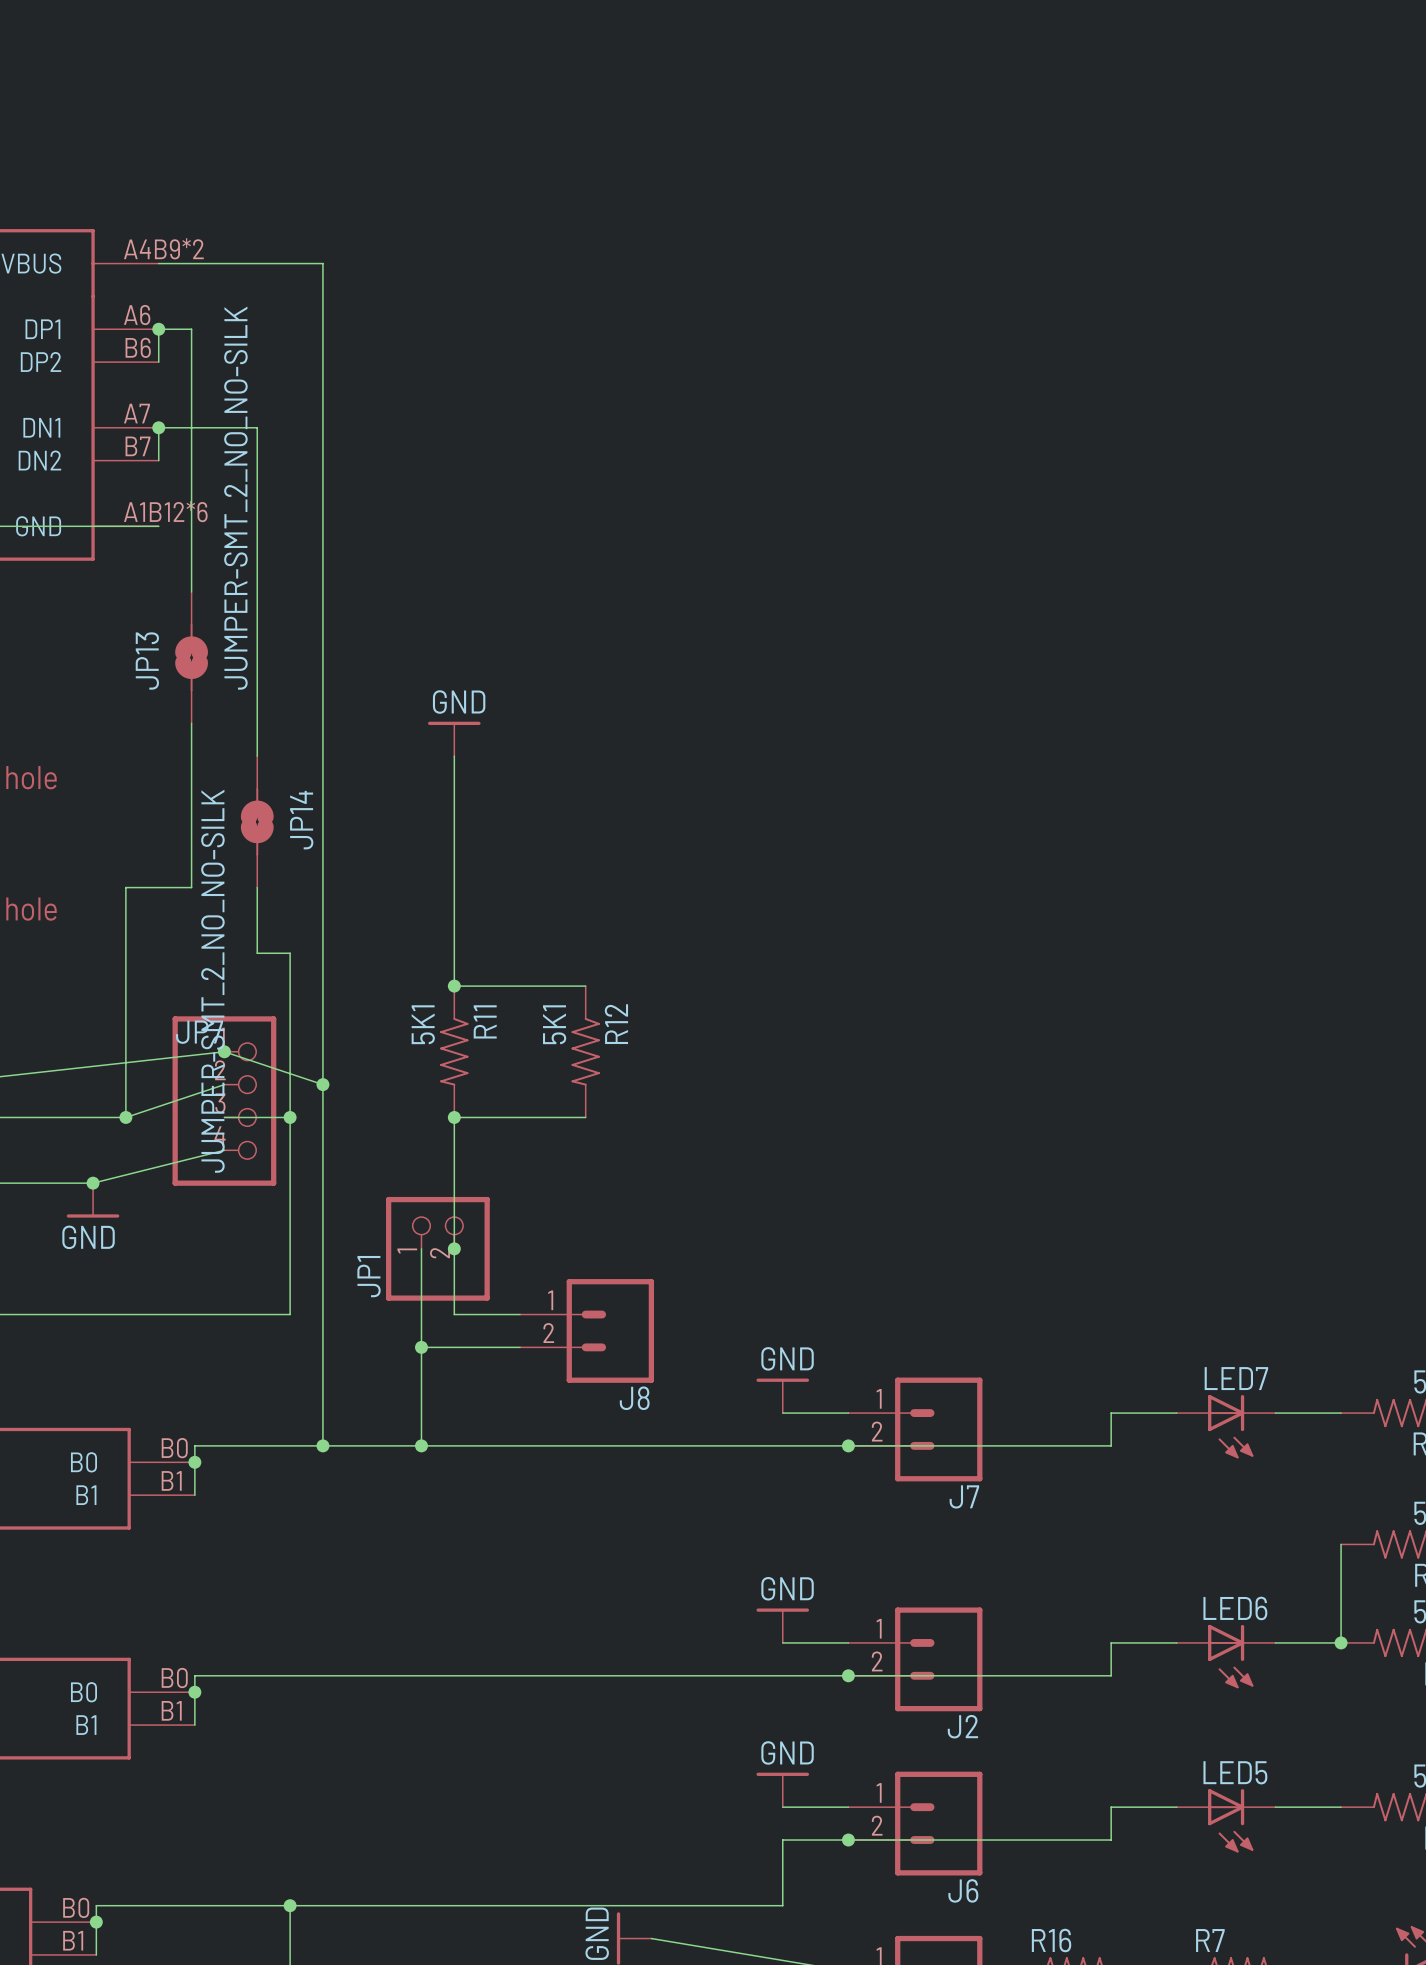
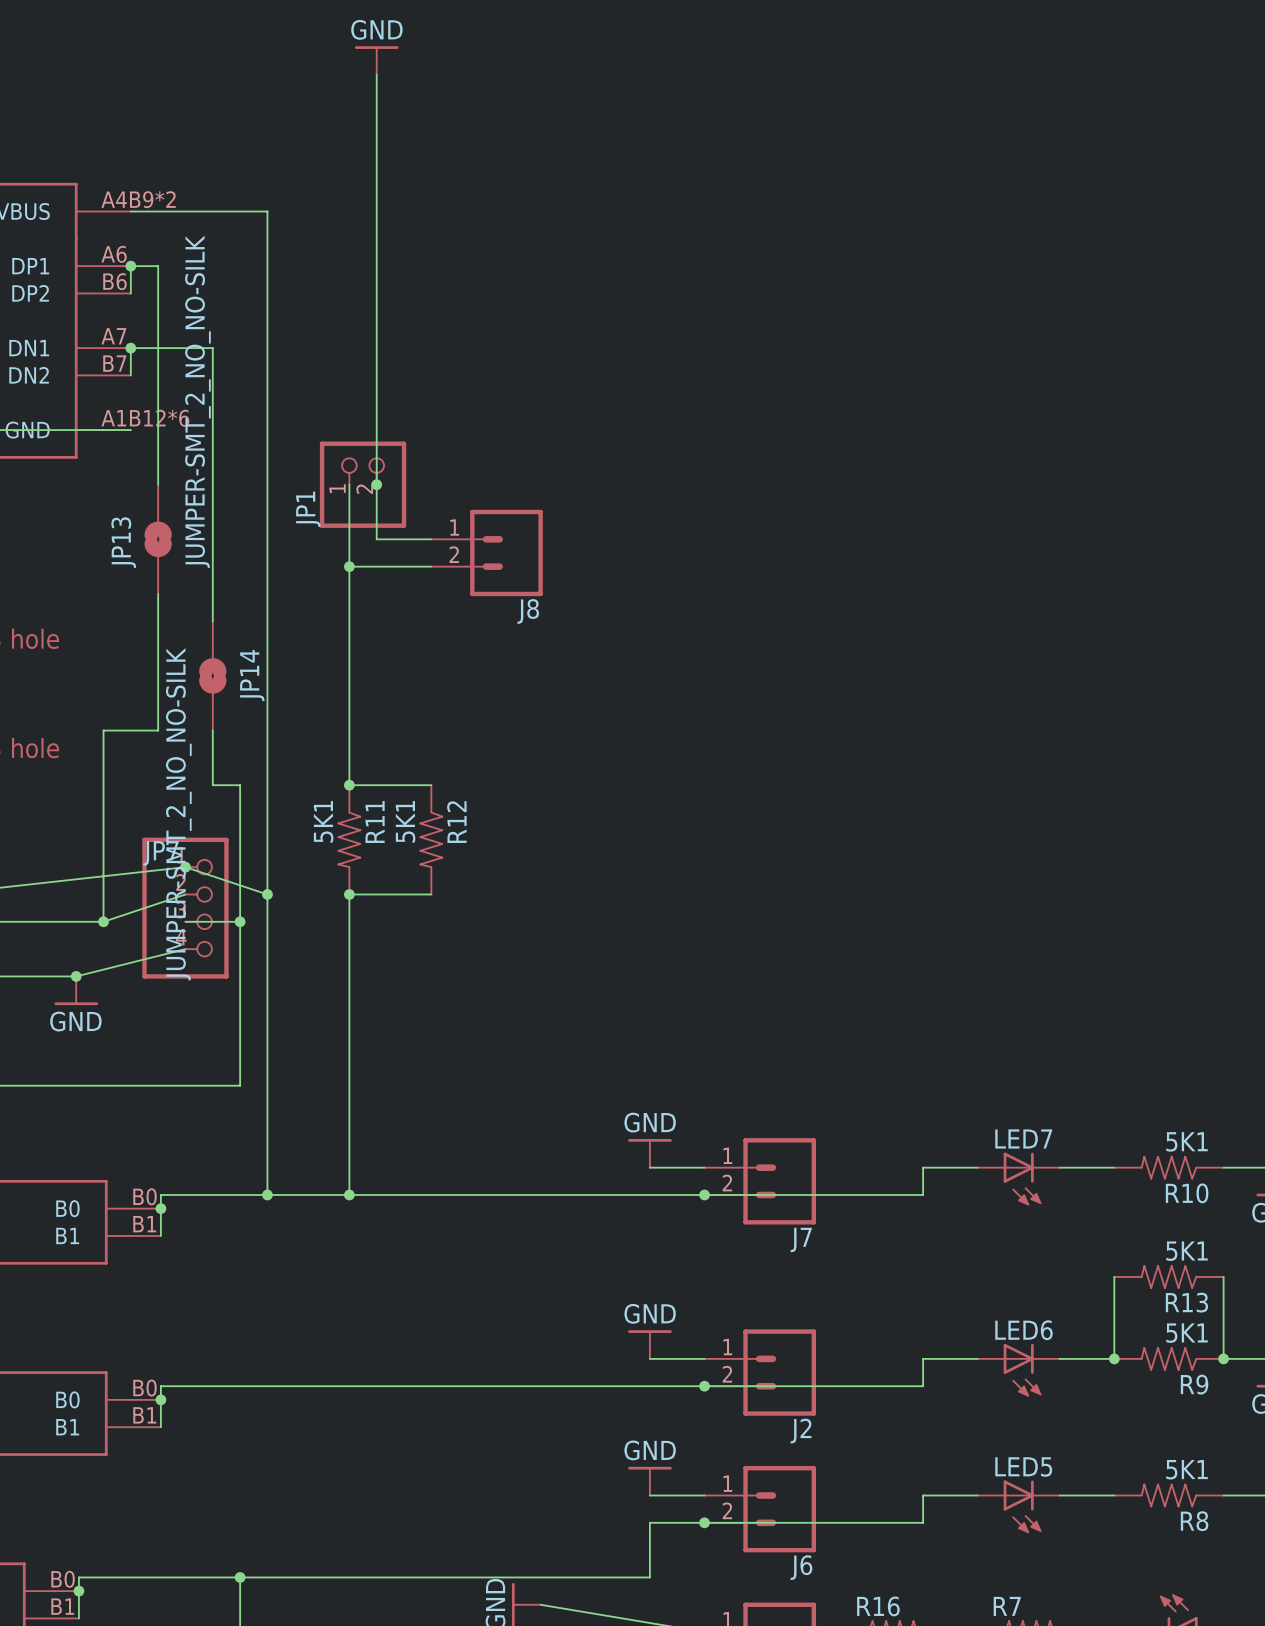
power symbol: none -> GND (376, 60)
wire: none -> (376, 74) (376, 539) (431, 539)
wire: none -> (349, 484) (349, 785) (431, 785)
junction: none -> (376, 484)
wire: none -> (349, 566) (431, 566)
junction: none -> (349, 566)
power symbol: GND (454, 738) -> none
wire: (454, 756) (454, 986) (585, 986) -> none
junction position: (454, 986) -> (349, 785)
R11 position: (454, 1051) -> (349, 839)
R12 position: (585, 1051) -> (431, 839)
wire: none -> (431, 894) (349, 894) (349, 1031)
junction position: (454, 1117) -> (349, 894)
wire: (585, 1117) (454, 1117) (454, 1314) (520, 1314) -> none
JP1 position: (437, 1248) -> (363, 484)
junction: (454, 1248) -> none
J8 position: (587, 1330) -> (487, 552)
wire: (421, 1347) (520, 1347) -> none
junction: (421, 1347) -> none

